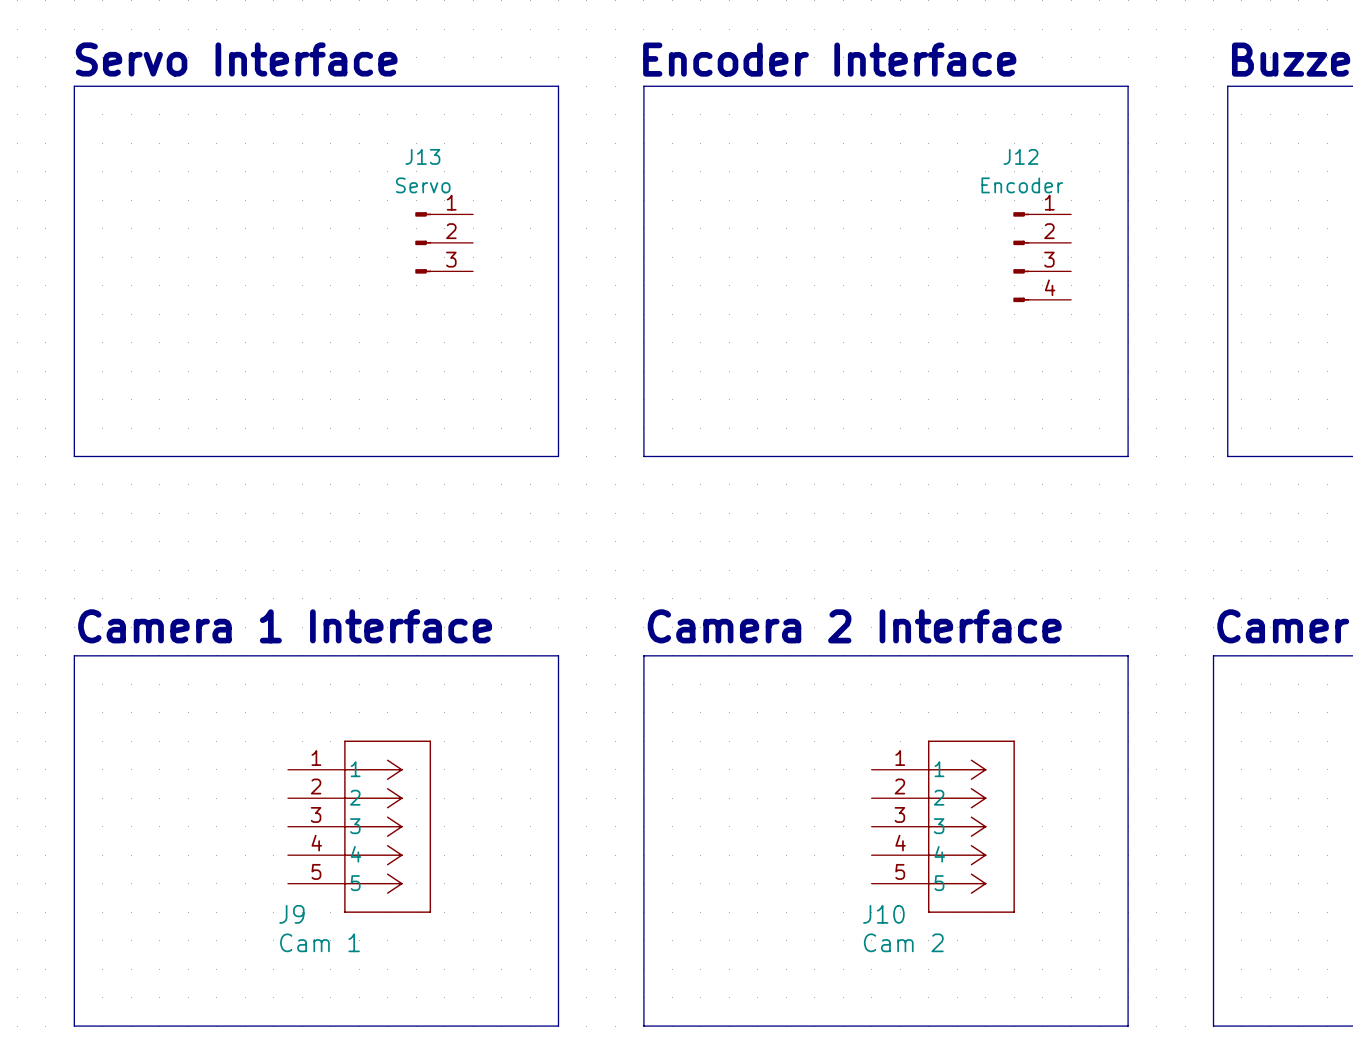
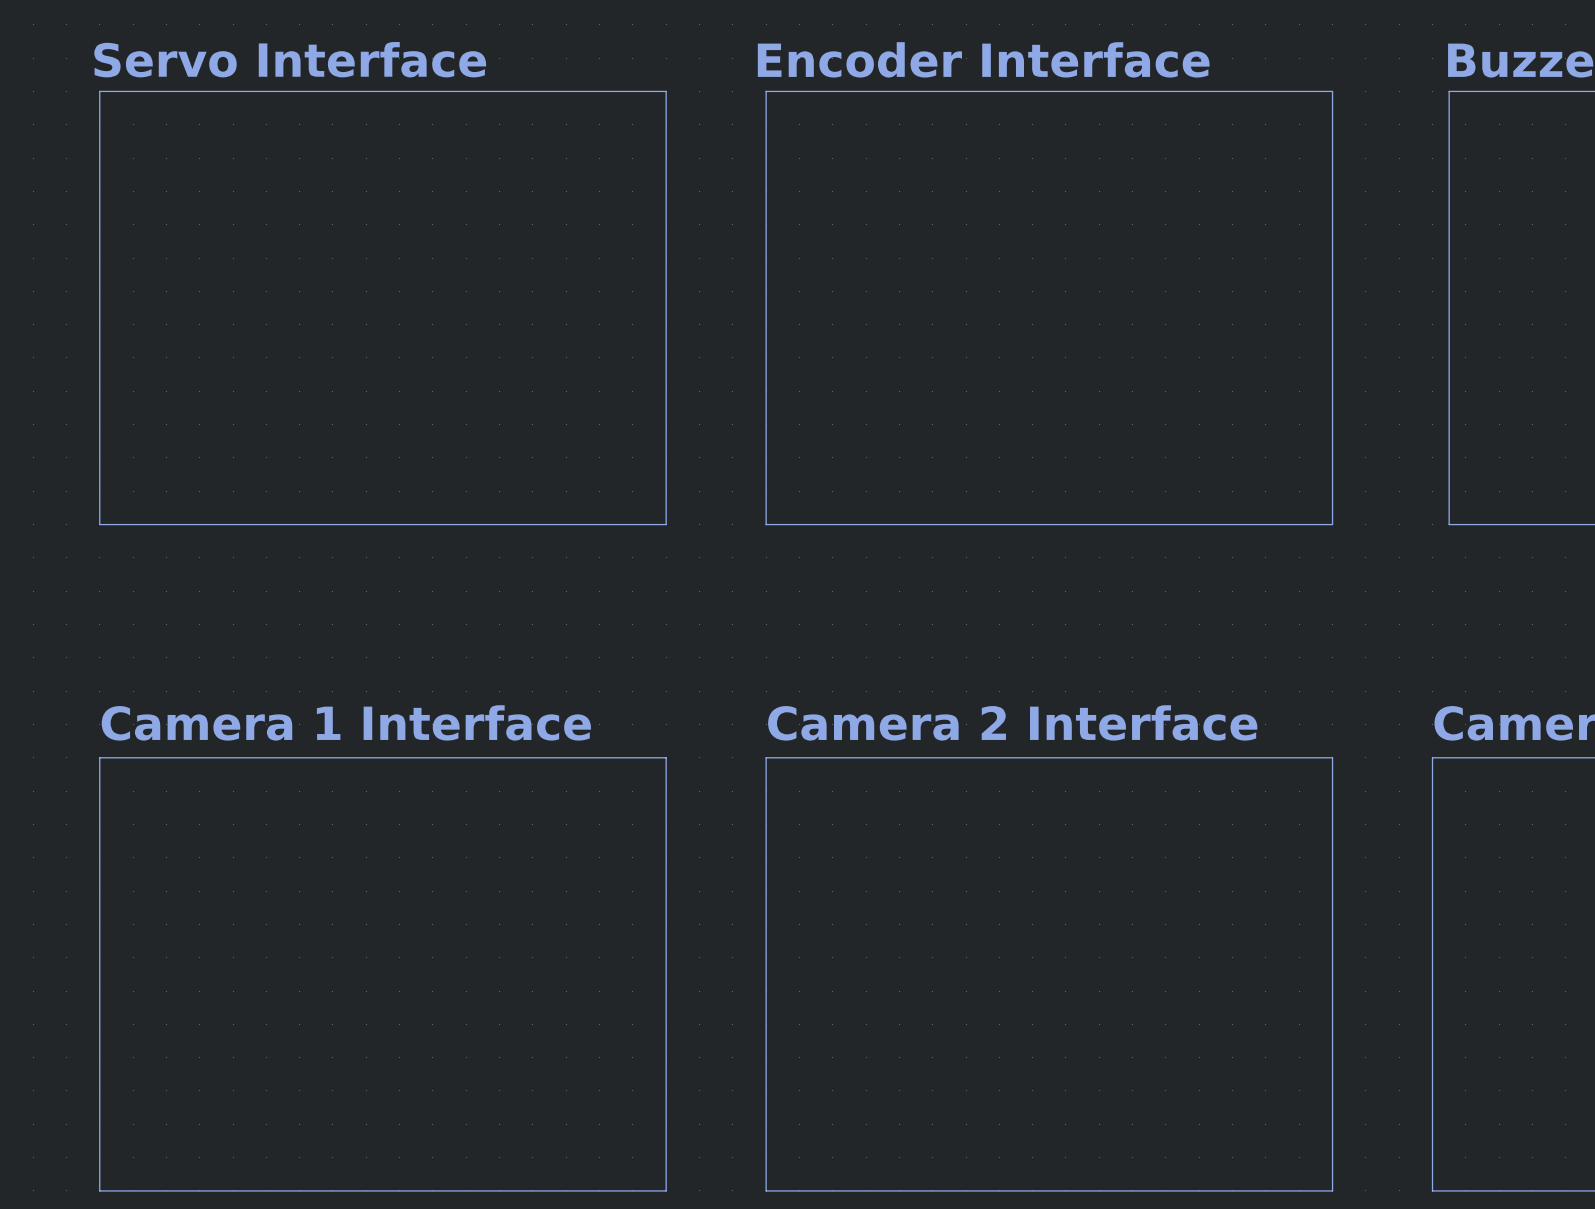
J13: Servo (444, 242) -> none
J12: Encoder (1042, 257) -> none
J9: Cam 1 (359, 826) -> none
J10: Cam 2 (943, 826) -> none

